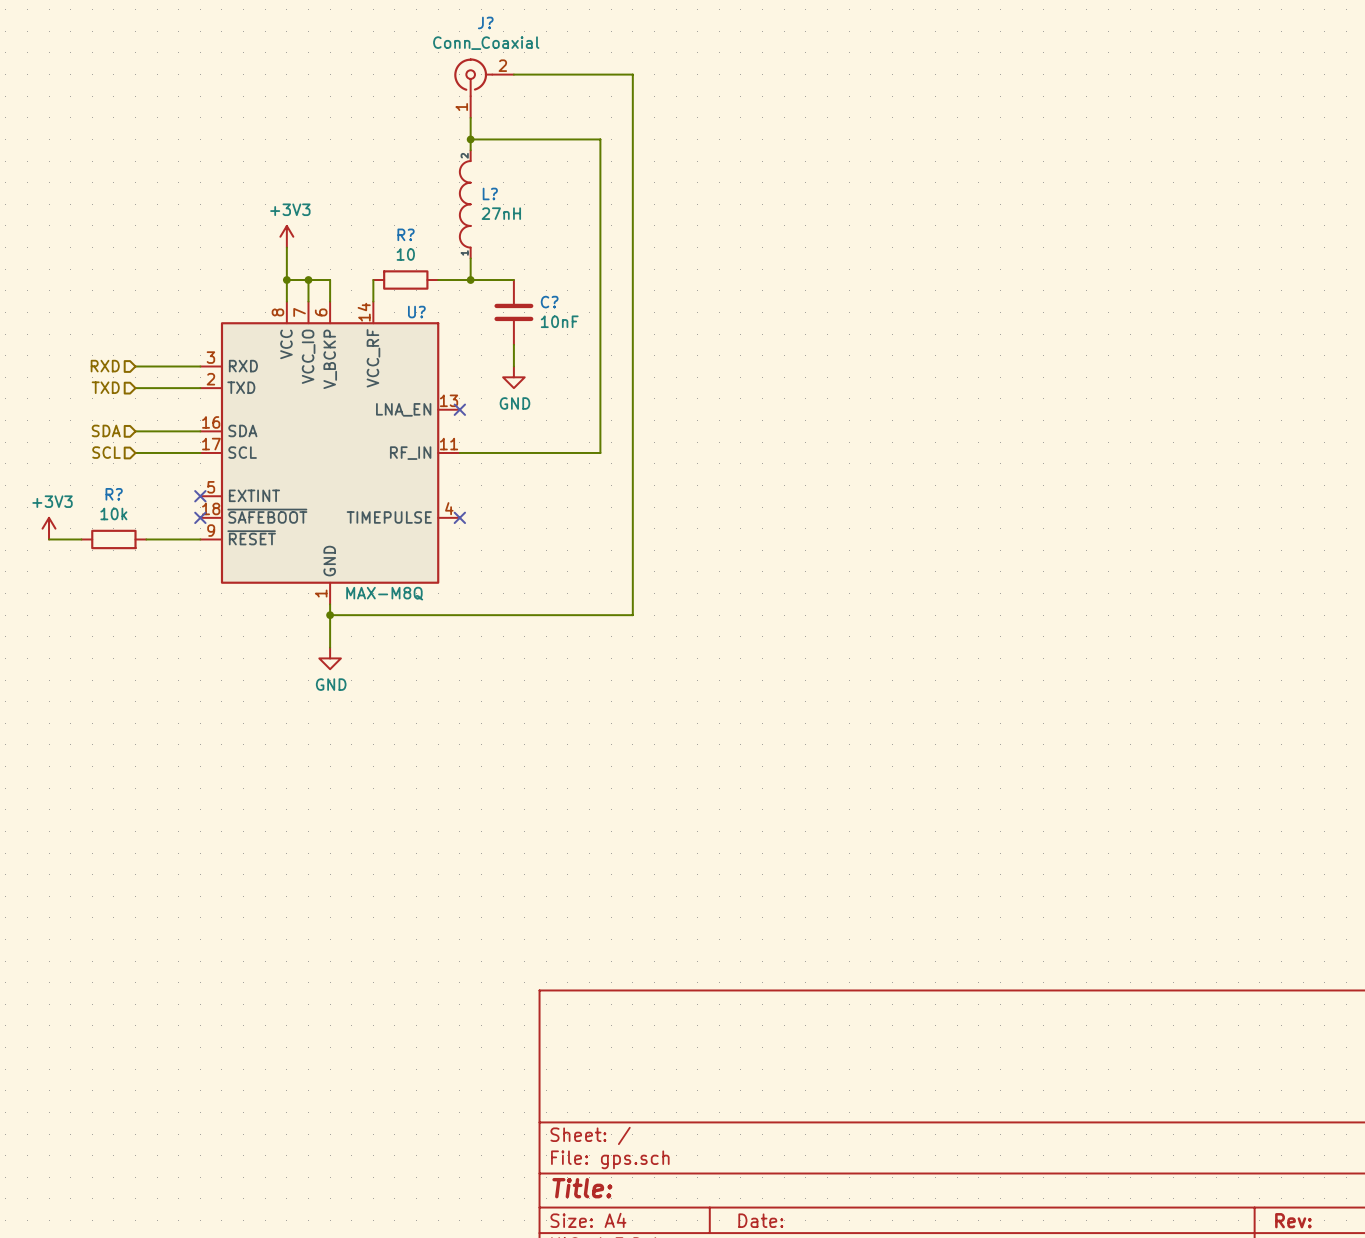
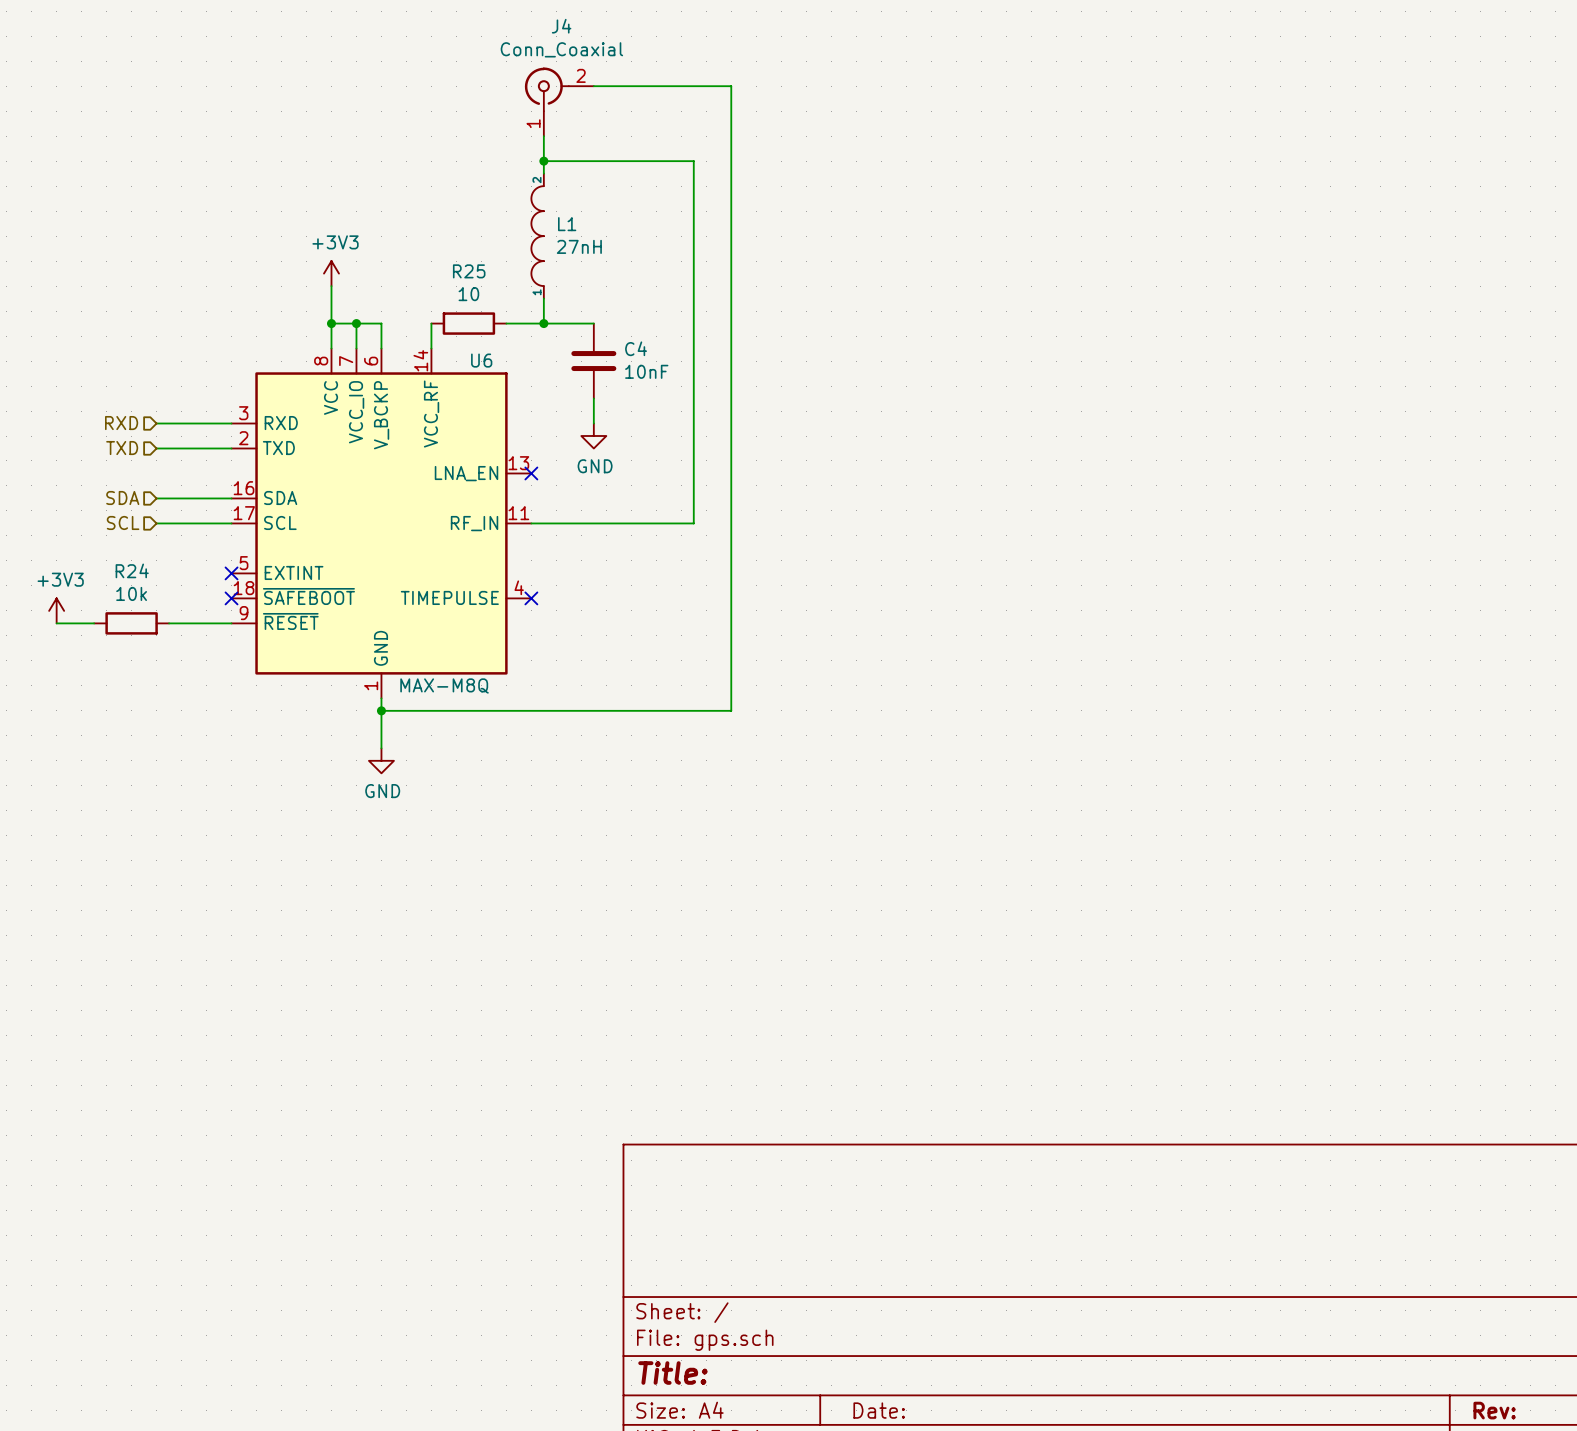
J? name: J? (485, 22) -> J4 (561, 26)
L? name: L? (490, 193) -> L1 (567, 224)
R? name: R? (406, 234) -> R25 (469, 271)
C? name: C? (549, 302) -> C4 (636, 348)
U? name: U? (416, 312) -> U6 (481, 360)
R? name: R? (114, 494) -> R24 (132, 570)

